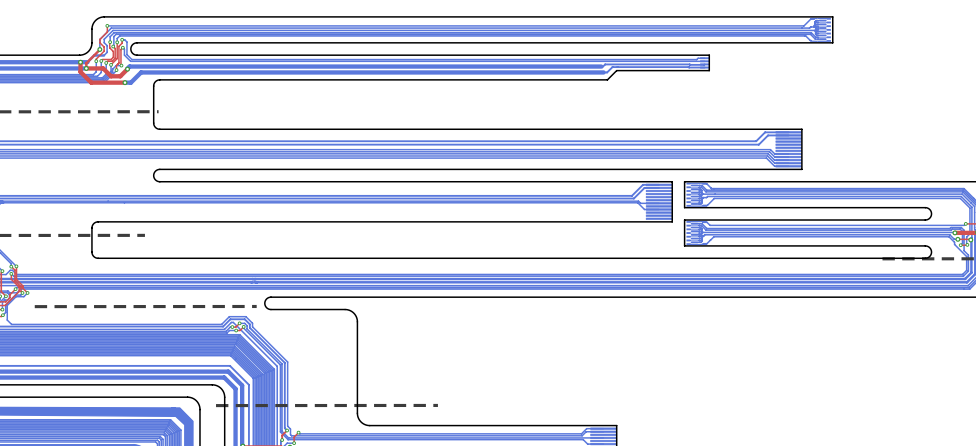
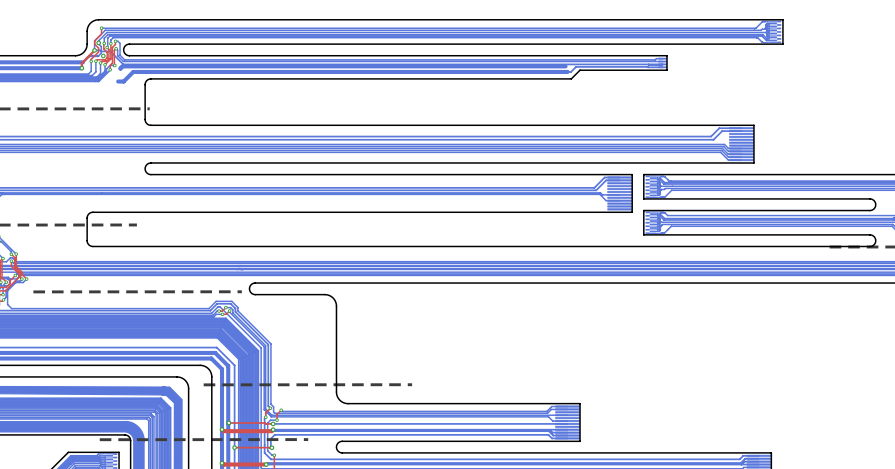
via: none -> (98, 42)
via: none -> (103, 56)
top track: (80, 62) (80, 71) (91, 82) (124, 82) -> none
via: (80, 62) -> none
bottom track: (605, 64) (602, 67) -> (569, 64) (123, 64) (110, 51) (94, 50)
top track: (86, 68) (103, 68) (111, 76) (120, 76) (127, 69) -> none
via: (127, 69) -> none
via: (124, 82) -> none

